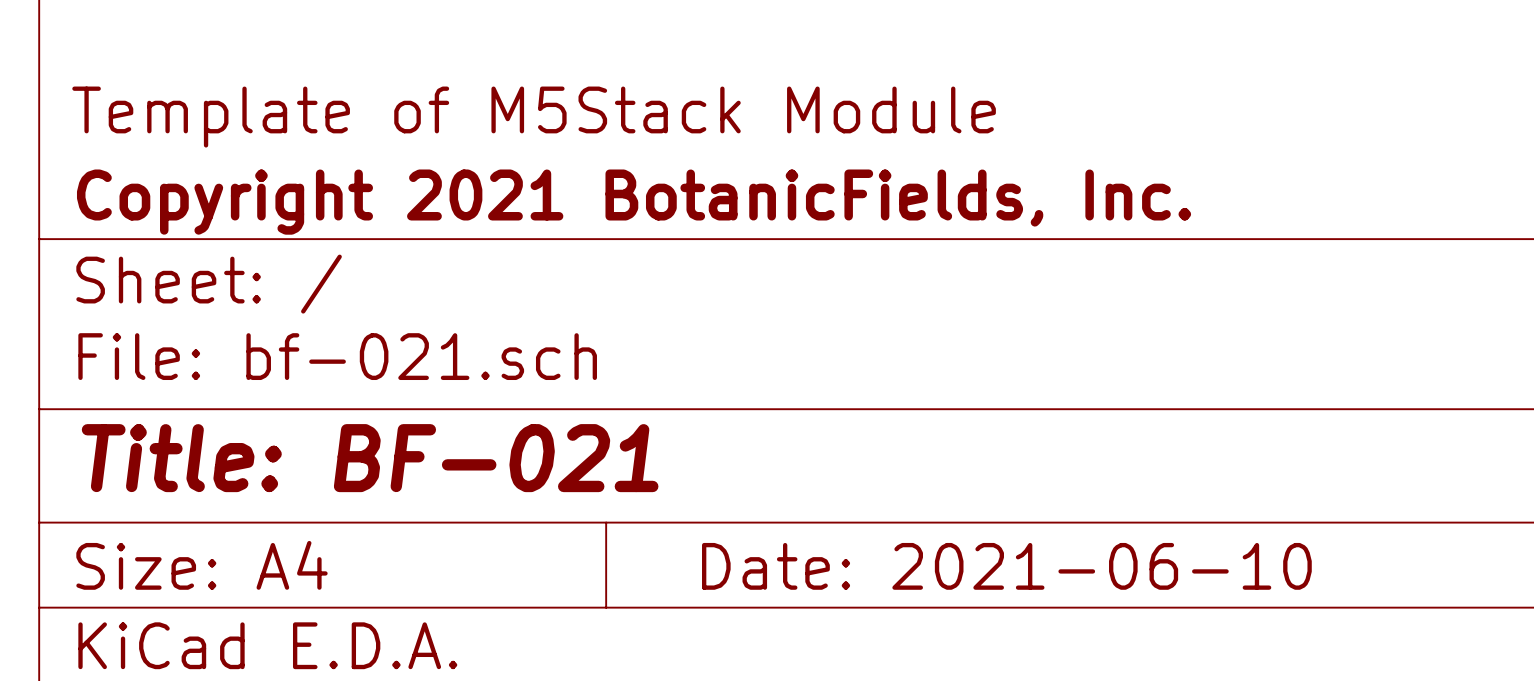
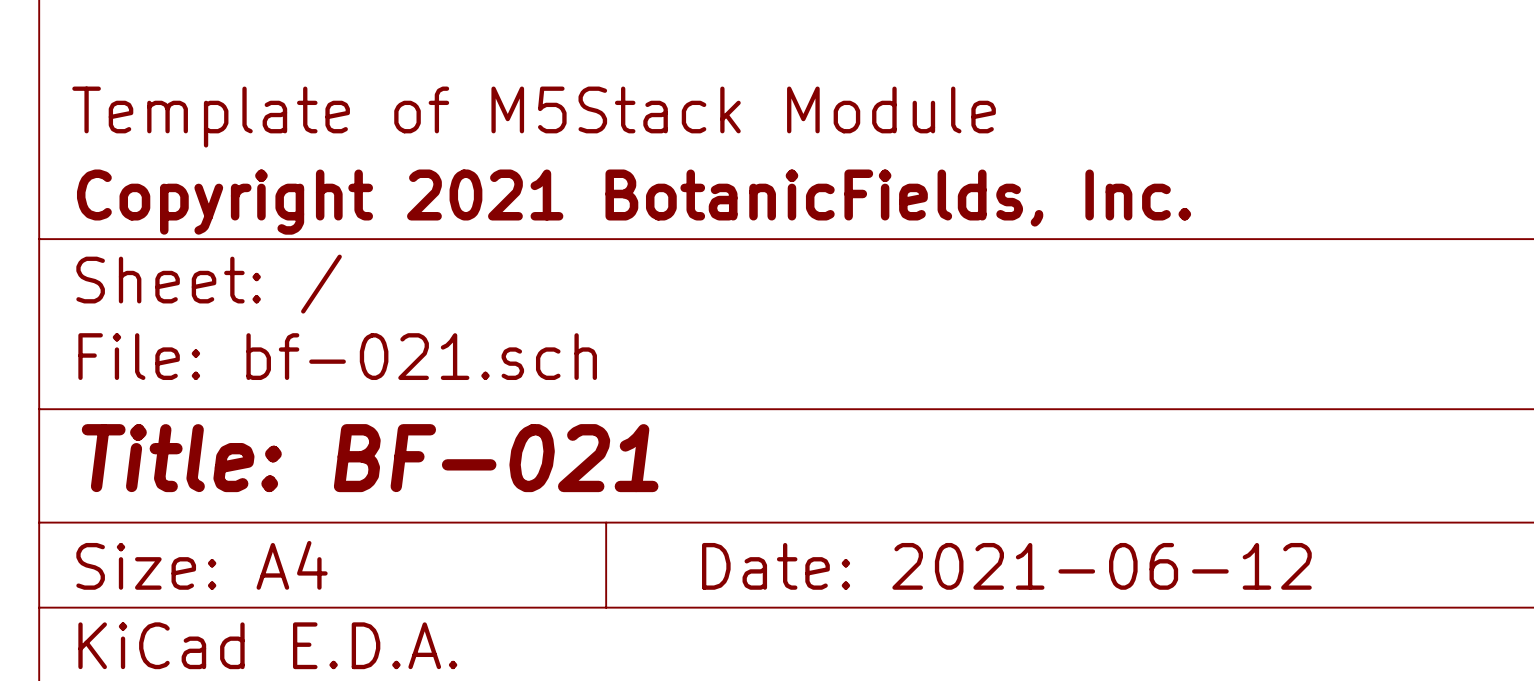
title block: Date: 2021-06-10 (1006, 566) -> Date: 2021-06-12 (1006, 566)

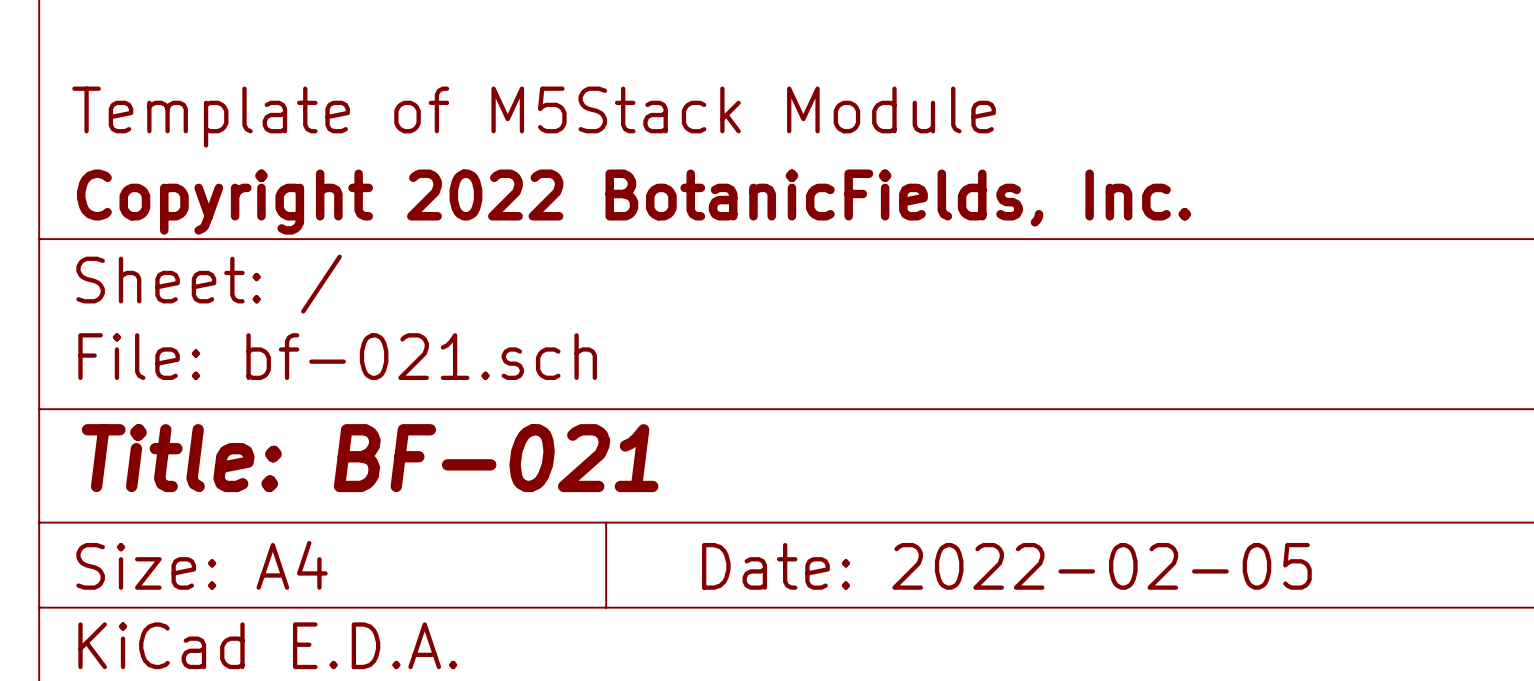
title block: Copyright 2021 BotanicFields, Inc. (634, 202) -> Copyright 2022 BotanicFields, Inc. (634, 202)
title block: Date: 2021-06-12 (1006, 566) -> Date: 2022-02-05 (1006, 566)

